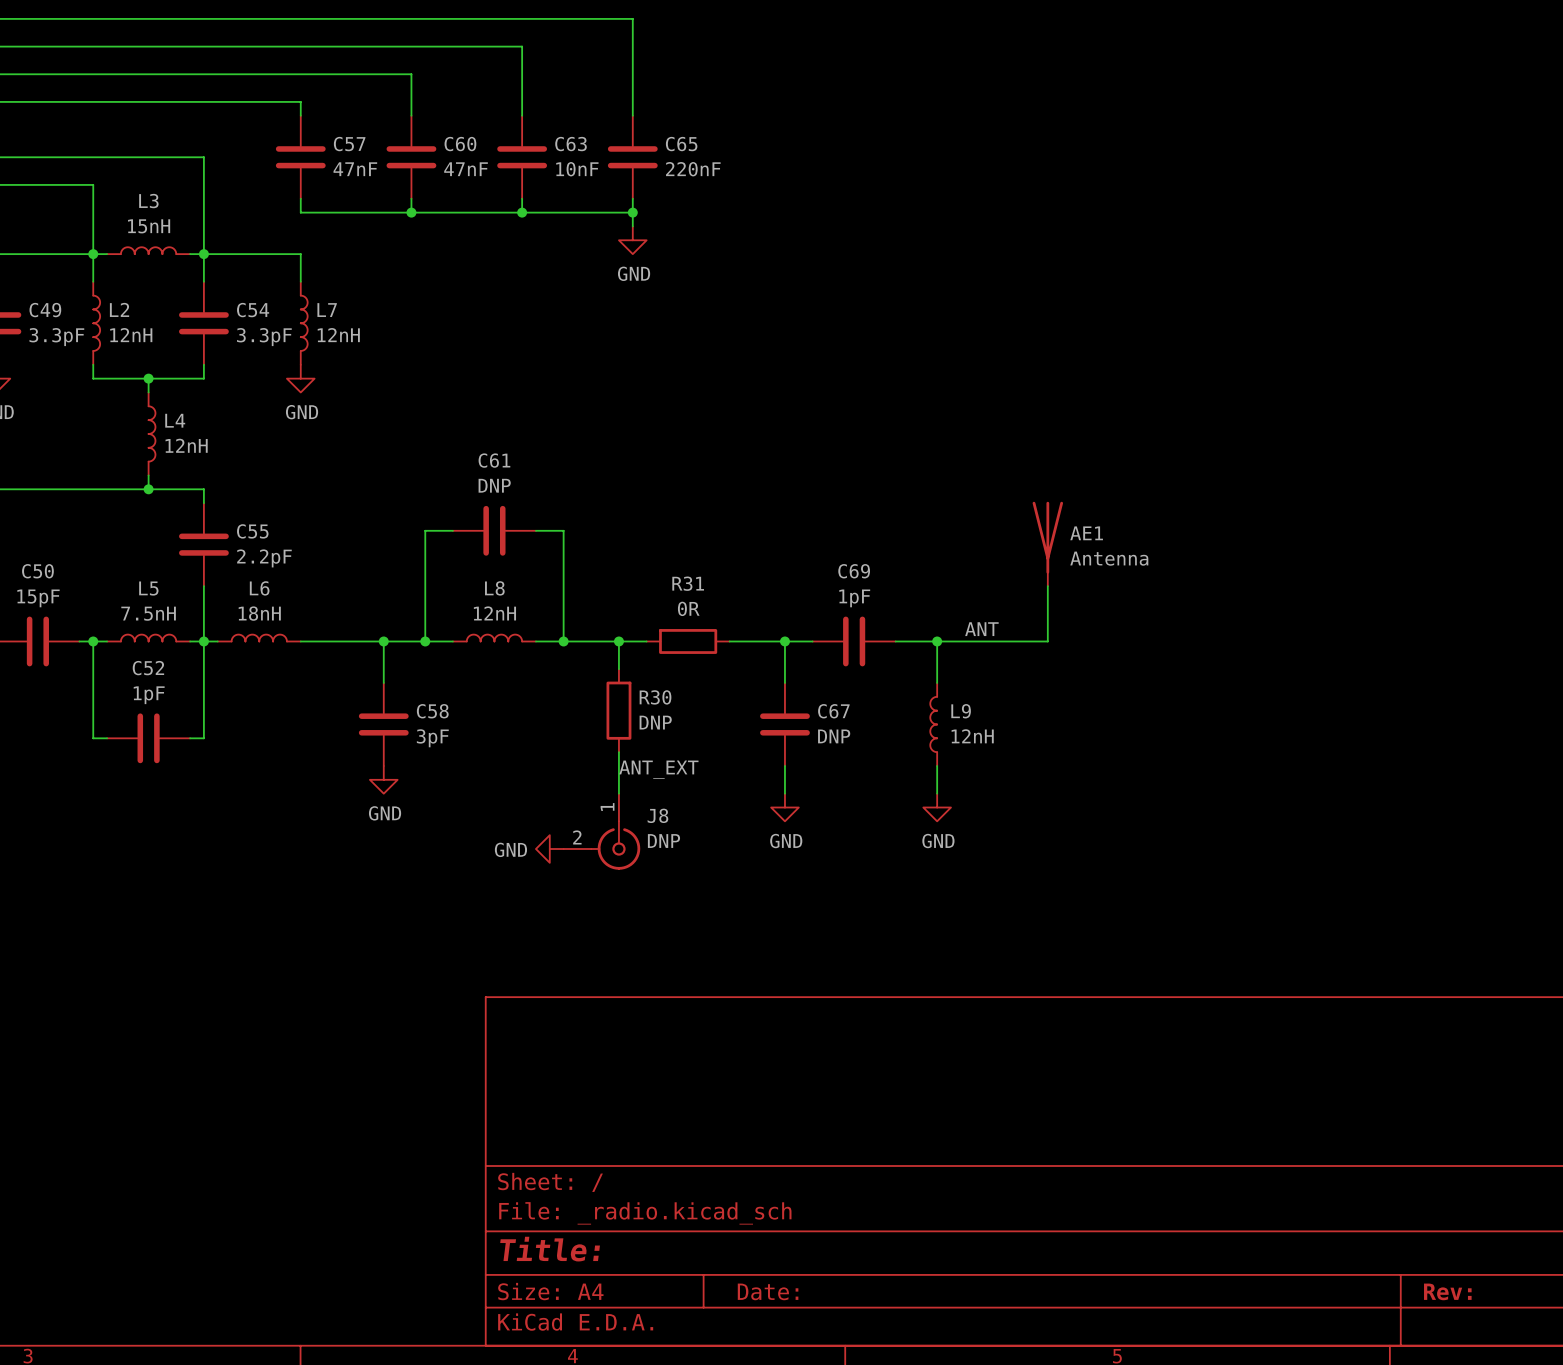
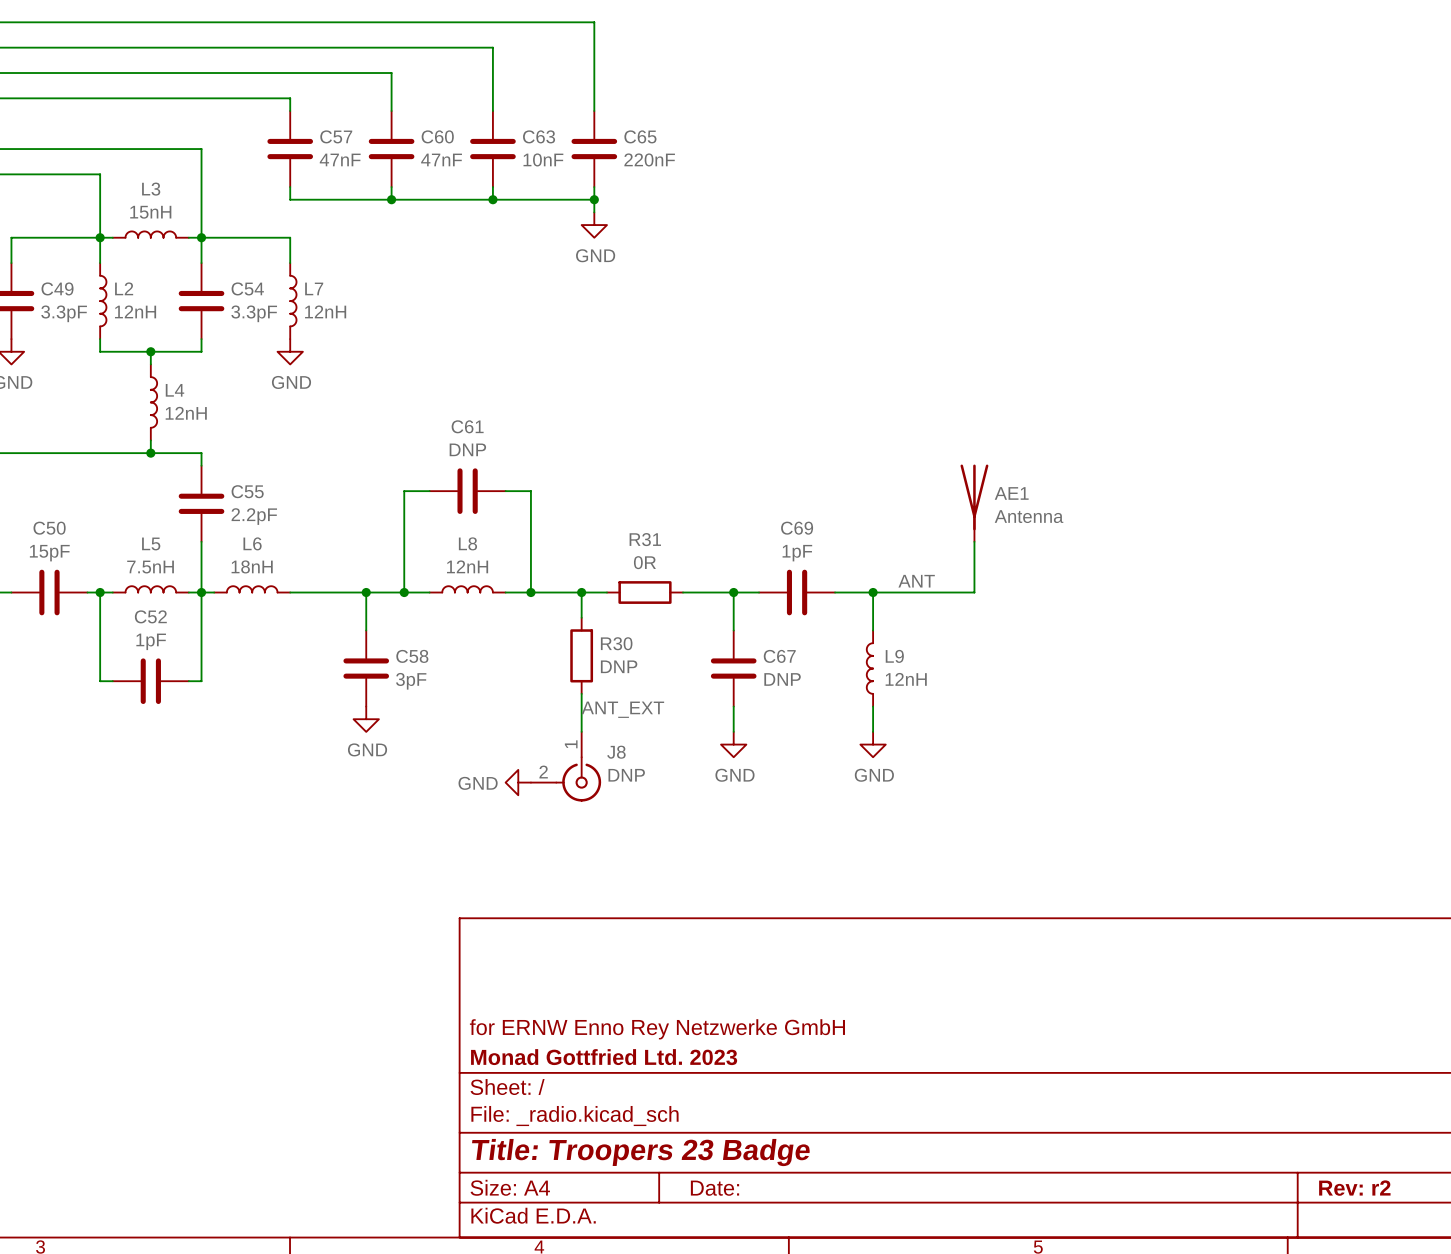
title block: none -> for ERNW Enno Rey Netzwerke GmbH (657, 1029)
title block: none -> Monad Gottfried Ltd. 2023 (604, 1057)
title block: Title: (550, 1249) -> Title: Troopers 23 Badge (641, 1152)
title block: Rev: (1447, 1291) -> Rev: r2 (1354, 1188)

